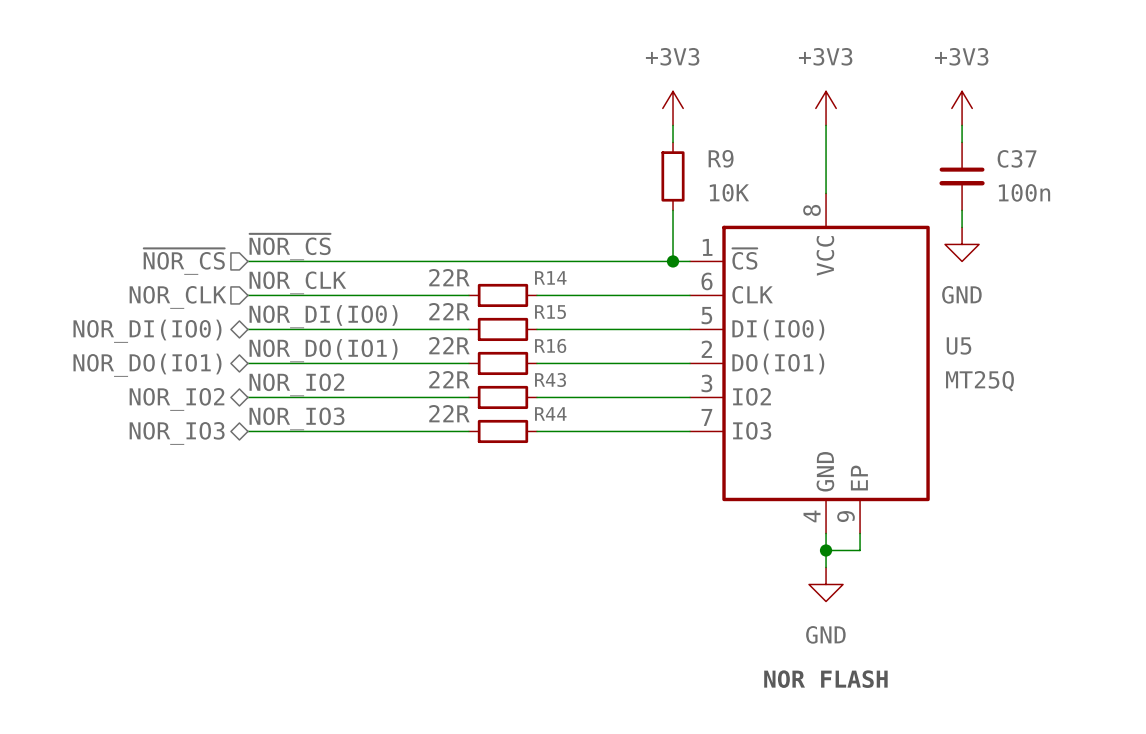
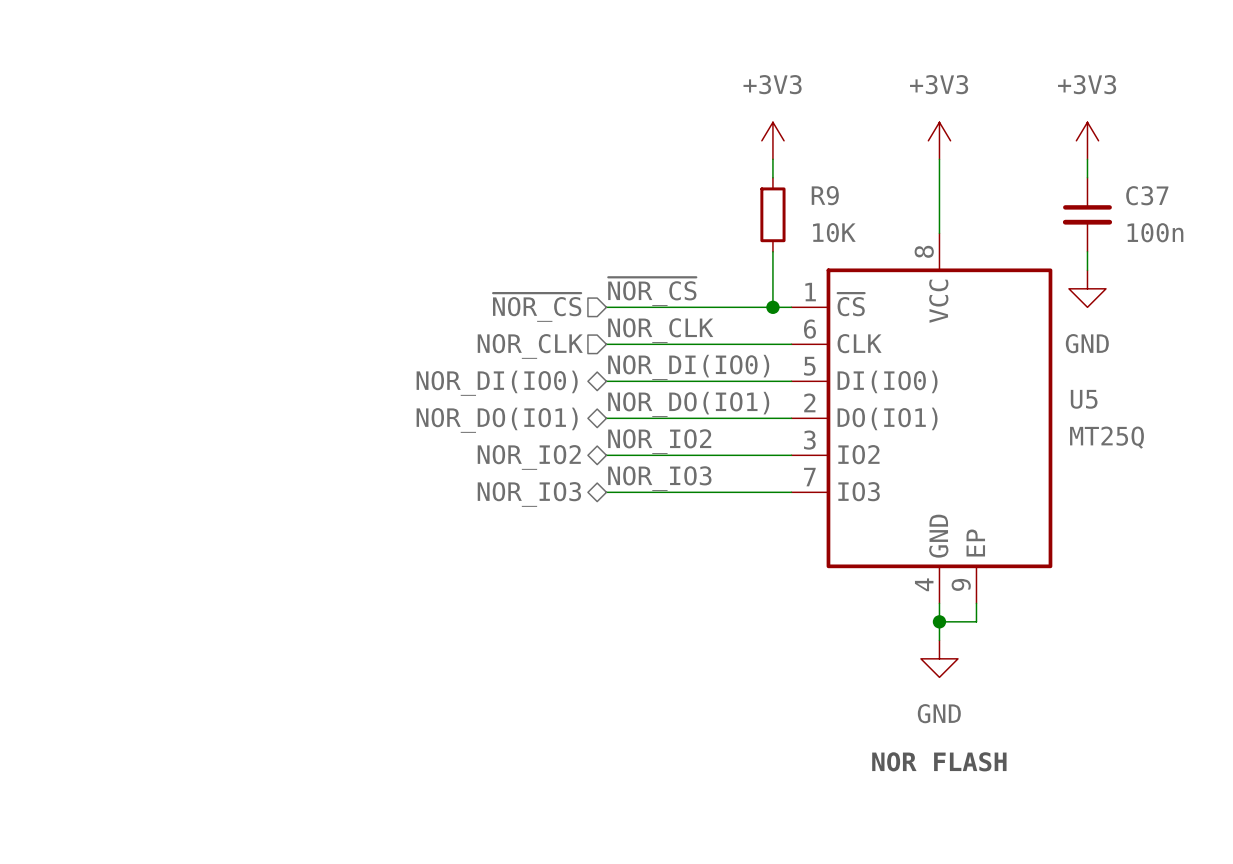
label position: ~{NOR_CS} (290, 247) -> ~{NOR_CS} (652, 291)
hierarchical label position: ~{NOR_CS} (184, 261) -> ~{NOR_CS} (537, 307)
wire: (247, 261) (519, 261) -> none
label position: NOR_CLK (297, 282) -> NOR_CLK (660, 330)
wire: (247, 295) (468, 295) -> none
R14: 22R (502, 295) -> none
hierarchical label position: NOR_CLK (177, 297) -> NOR_CLK (530, 346)
label position: NOR_DI(IO0) (323, 316) -> NOR_DI(IO0) (688, 367)
wire: (247, 329) (468, 329) -> none
R15: 22R (502, 329) -> none
hierarchical label position: NOR_DI(IO0) (147, 331) -> NOR_DI(IO0) (497, 383)
label position: NOR_DO(IO1) (323, 350) -> NOR_DO(IO1) (688, 404)
wire: (247, 363) (468, 363) -> none
R16: 22R (502, 363) -> none
hierarchical label position: NOR_DO(IO1) (147, 365) -> NOR_DO(IO1) (497, 420)
label position: NOR_IO2 (296, 384) -> NOR_IO2 (659, 441)
wire: (247, 397) (468, 397) -> none
R43: 22R (502, 397) -> none
hierarchical label position: NOR_IO2 (177, 399) -> NOR_IO2 (529, 457)
label position: NOR_IO3 (296, 418) -> NOR_IO3 (659, 478)
wire: (247, 431) (468, 431) -> none
R44: 22R (502, 431) -> none
hierarchical label position: NOR_IO3 (177, 433) -> NOR_IO3 (529, 494)

